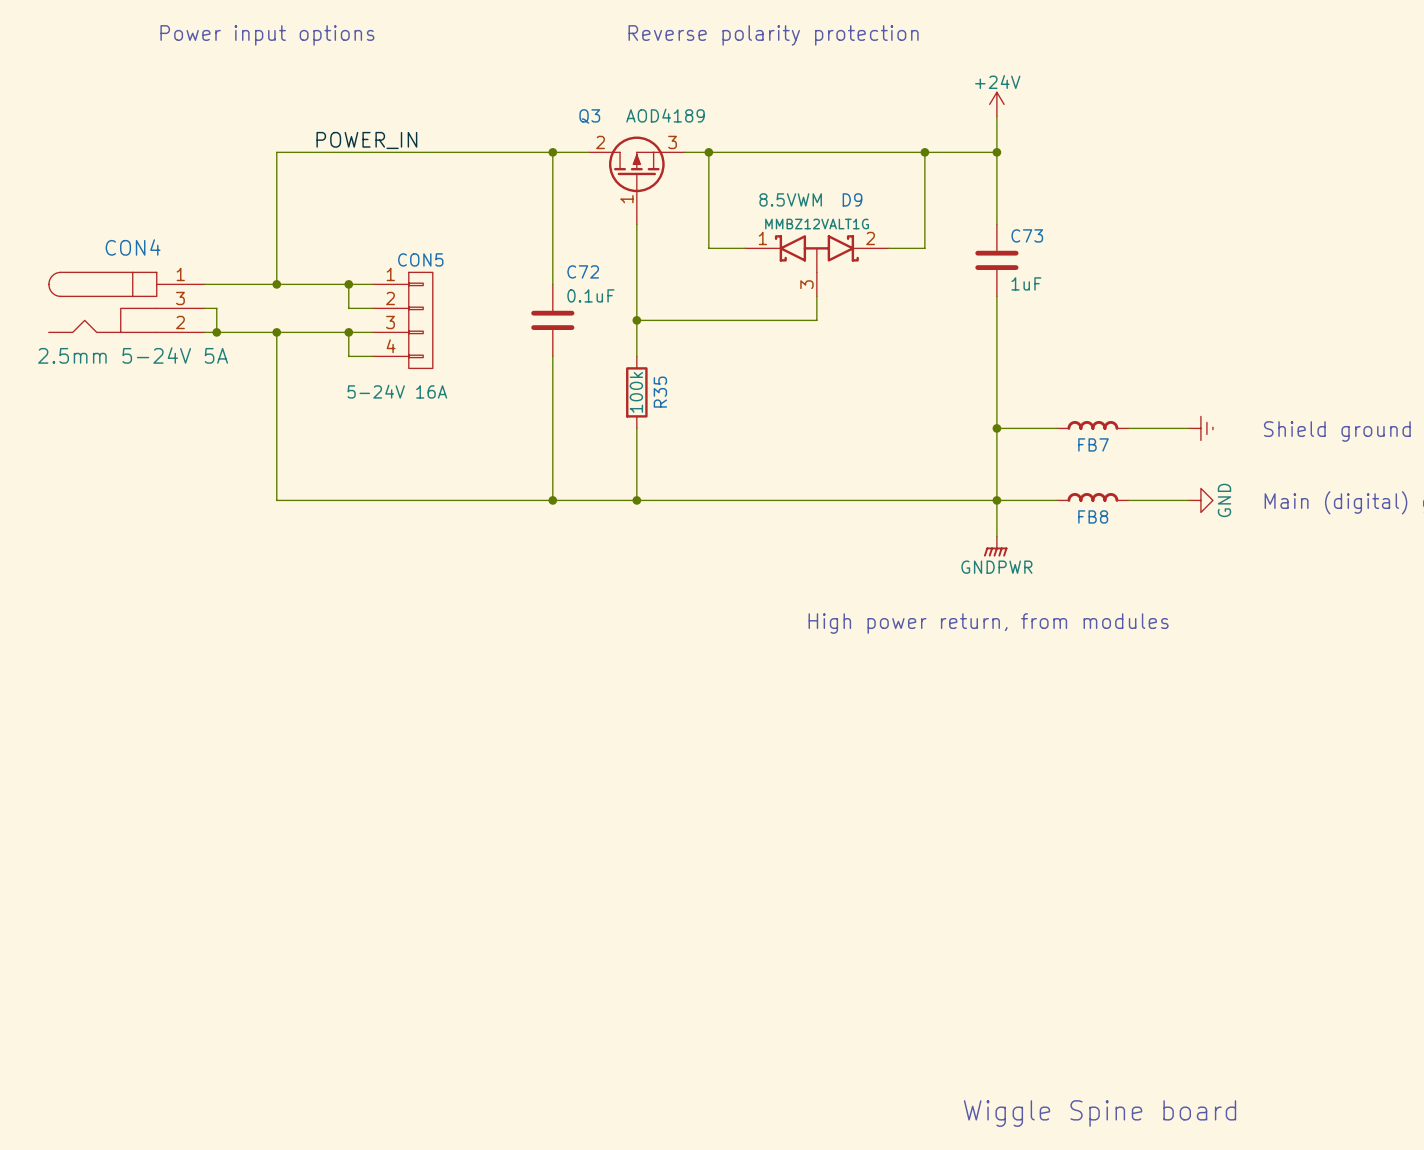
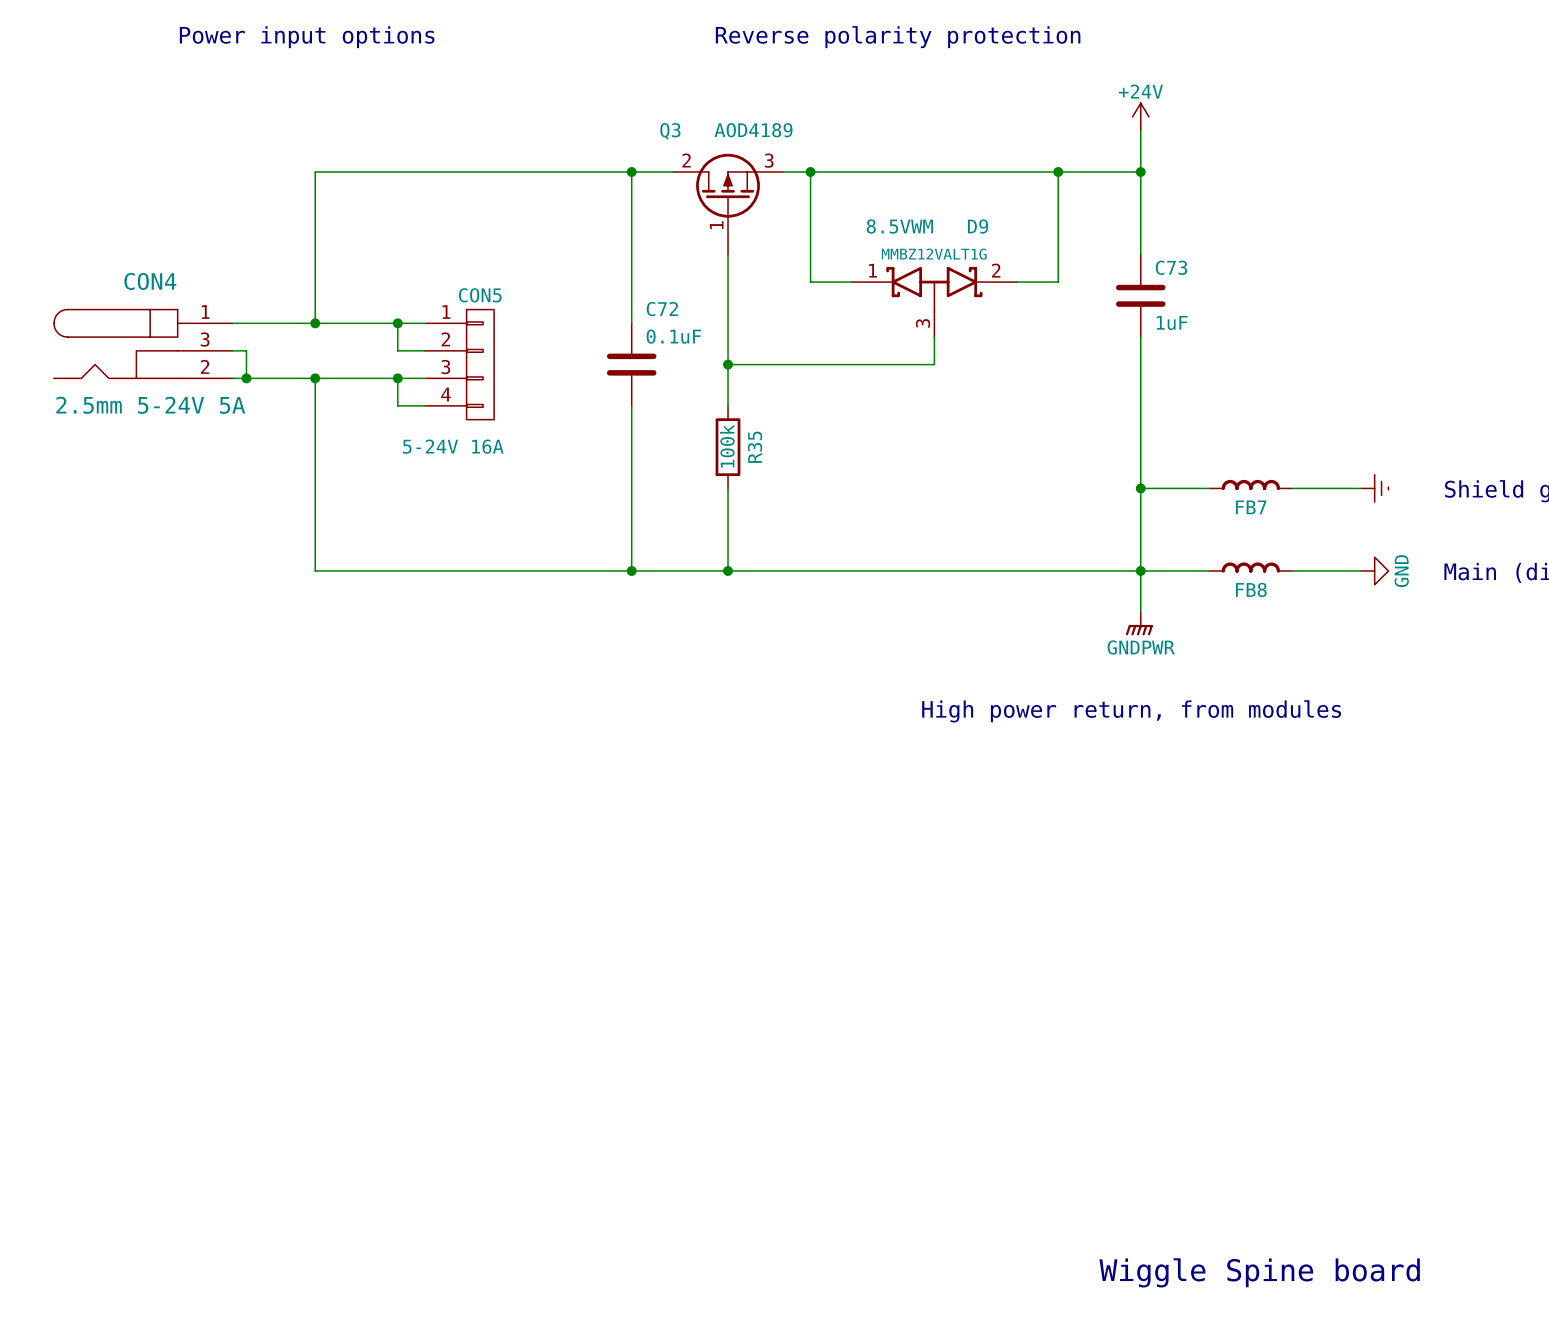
label: POWER_IN (366, 140) -> none

